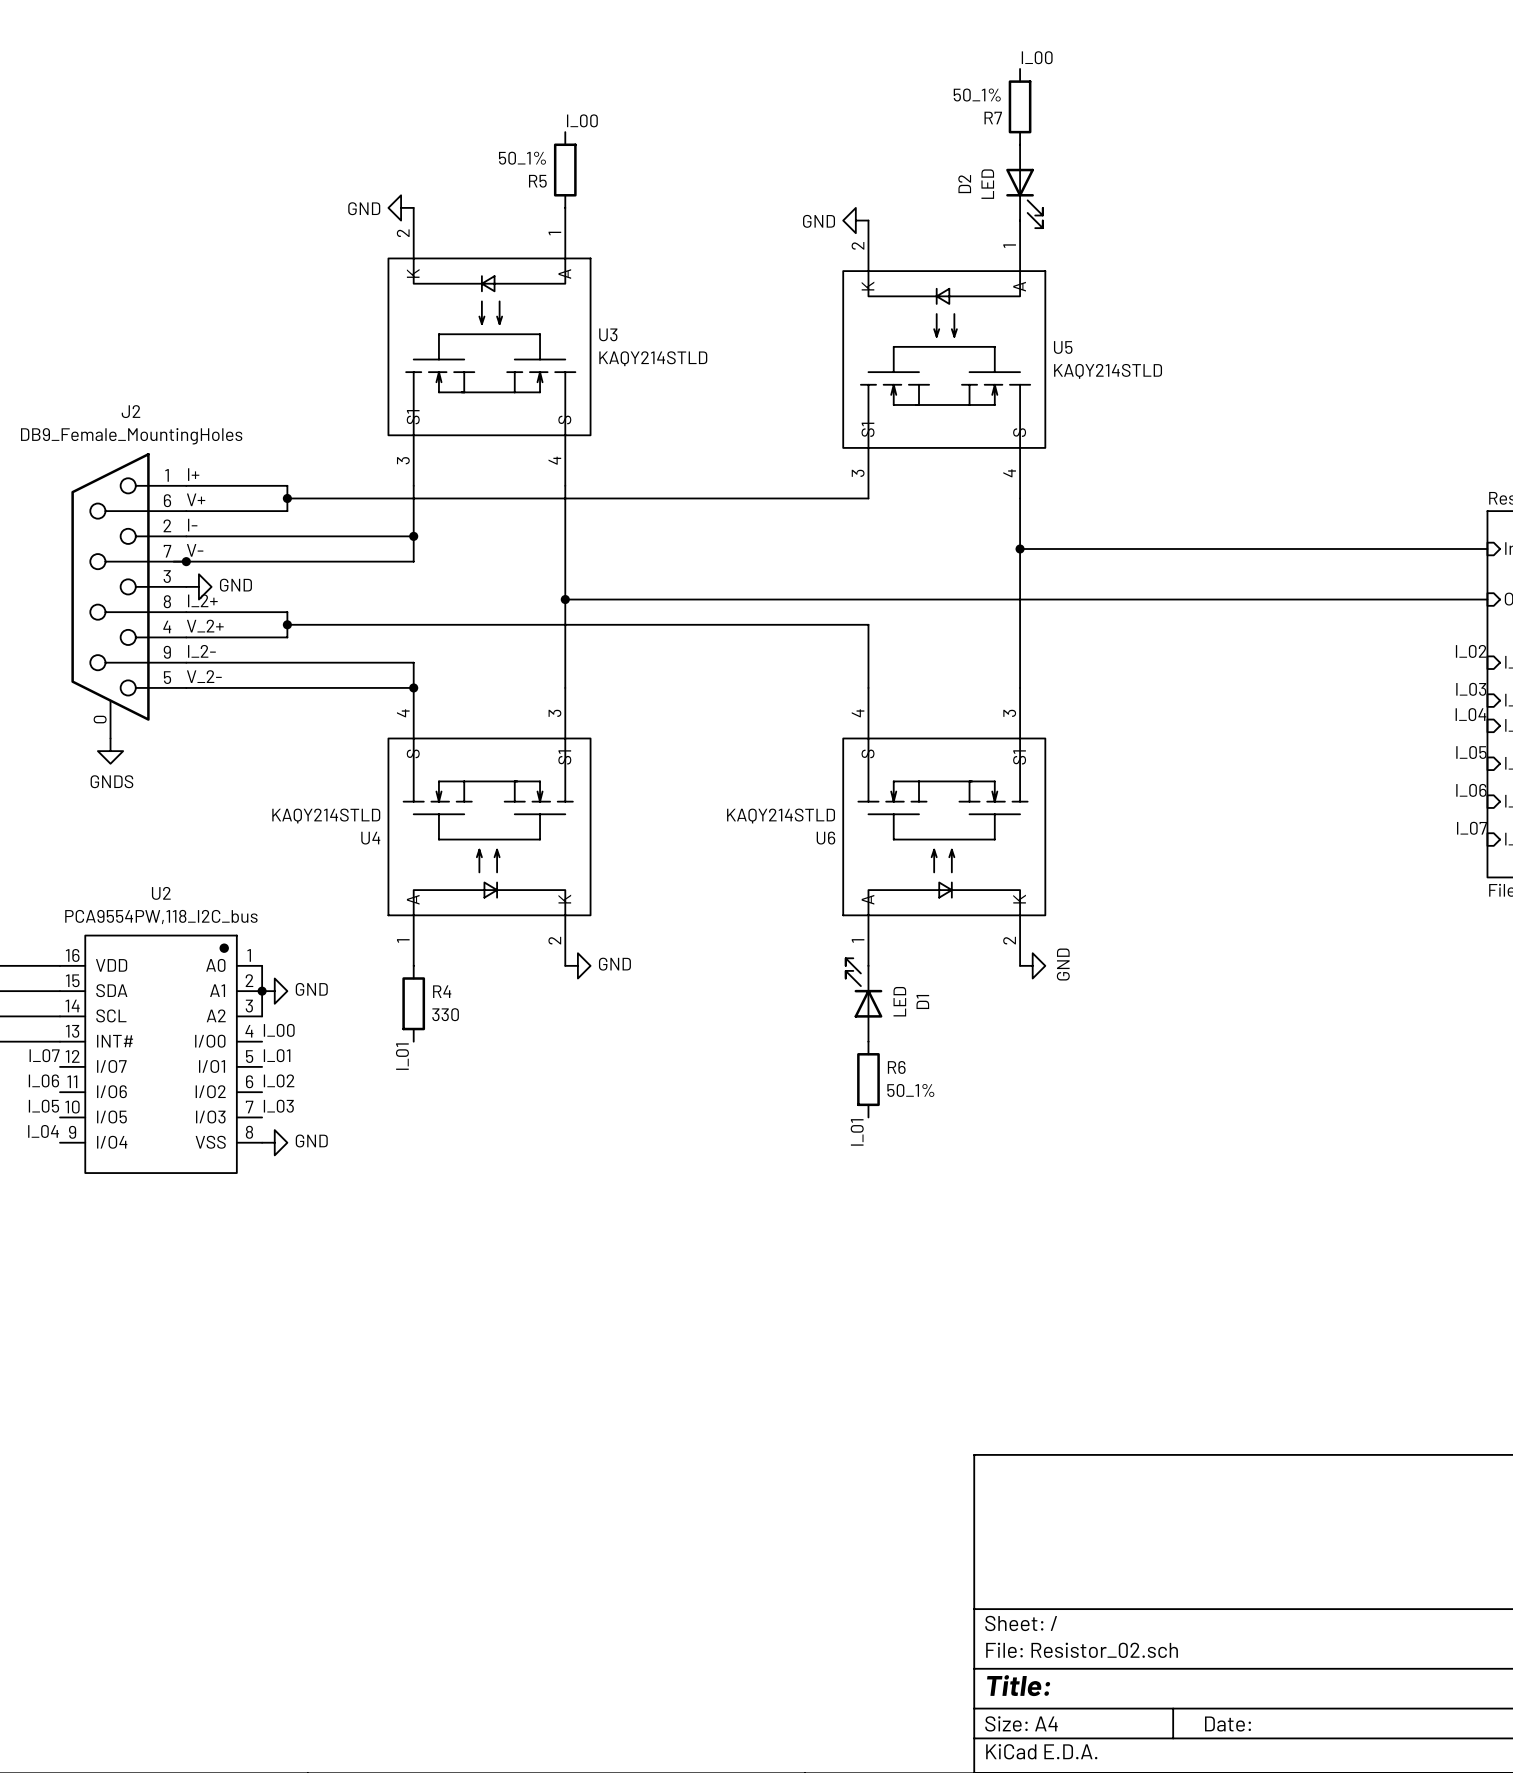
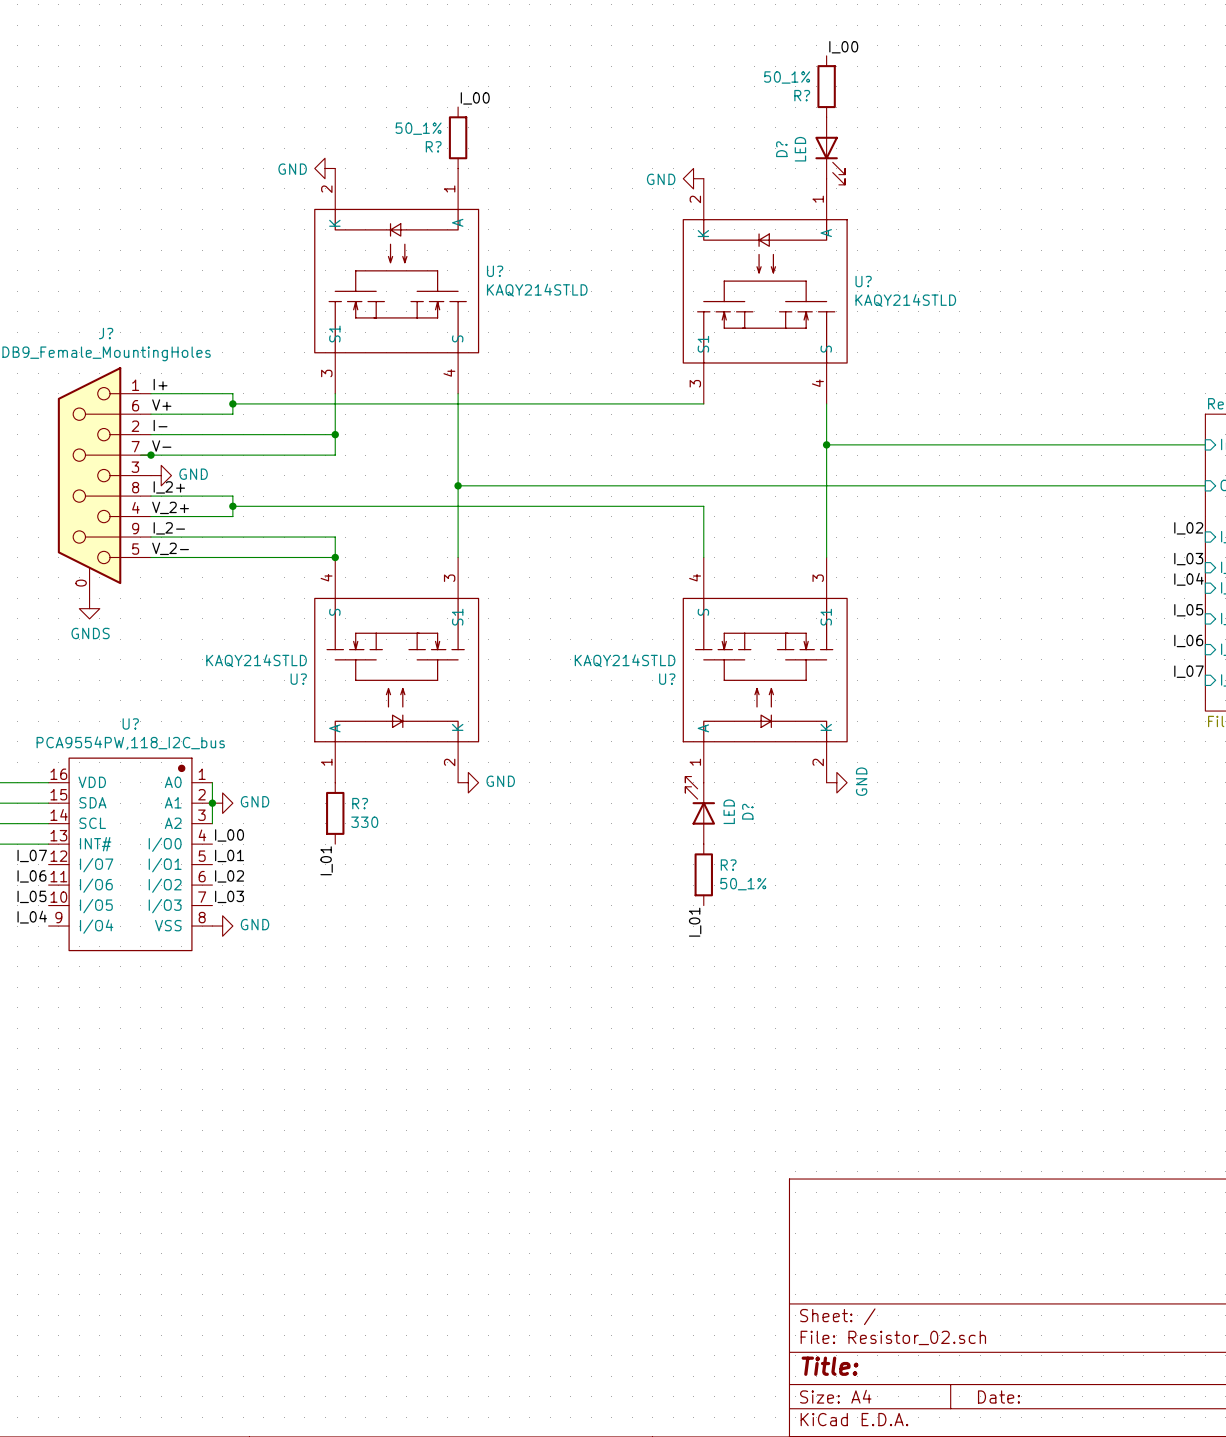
R7 name: R7 (993, 118) -> R? (802, 95)
R5 name: R5 (537, 181) -> R? (433, 146)
D2 name: D2 (964, 184) -> D? (781, 149)
U3 name: U3 (608, 334) -> U? (495, 271)
U5 name: U5 (1063, 347) -> U? (863, 281)
J2 name: J2 (130, 411) -> J? (106, 333)
U4 name: U4 (370, 838) -> U? (298, 679)
U6 name: U6 (825, 838) -> U? (667, 679)
U2 name: U2 (161, 893) -> U? (130, 723)
R4 name: R4 (442, 991) -> R? (360, 803)
D1 name: D1 (922, 1001) -> D? (747, 811)
R6 name: R6 (896, 1067) -> R? (728, 865)

